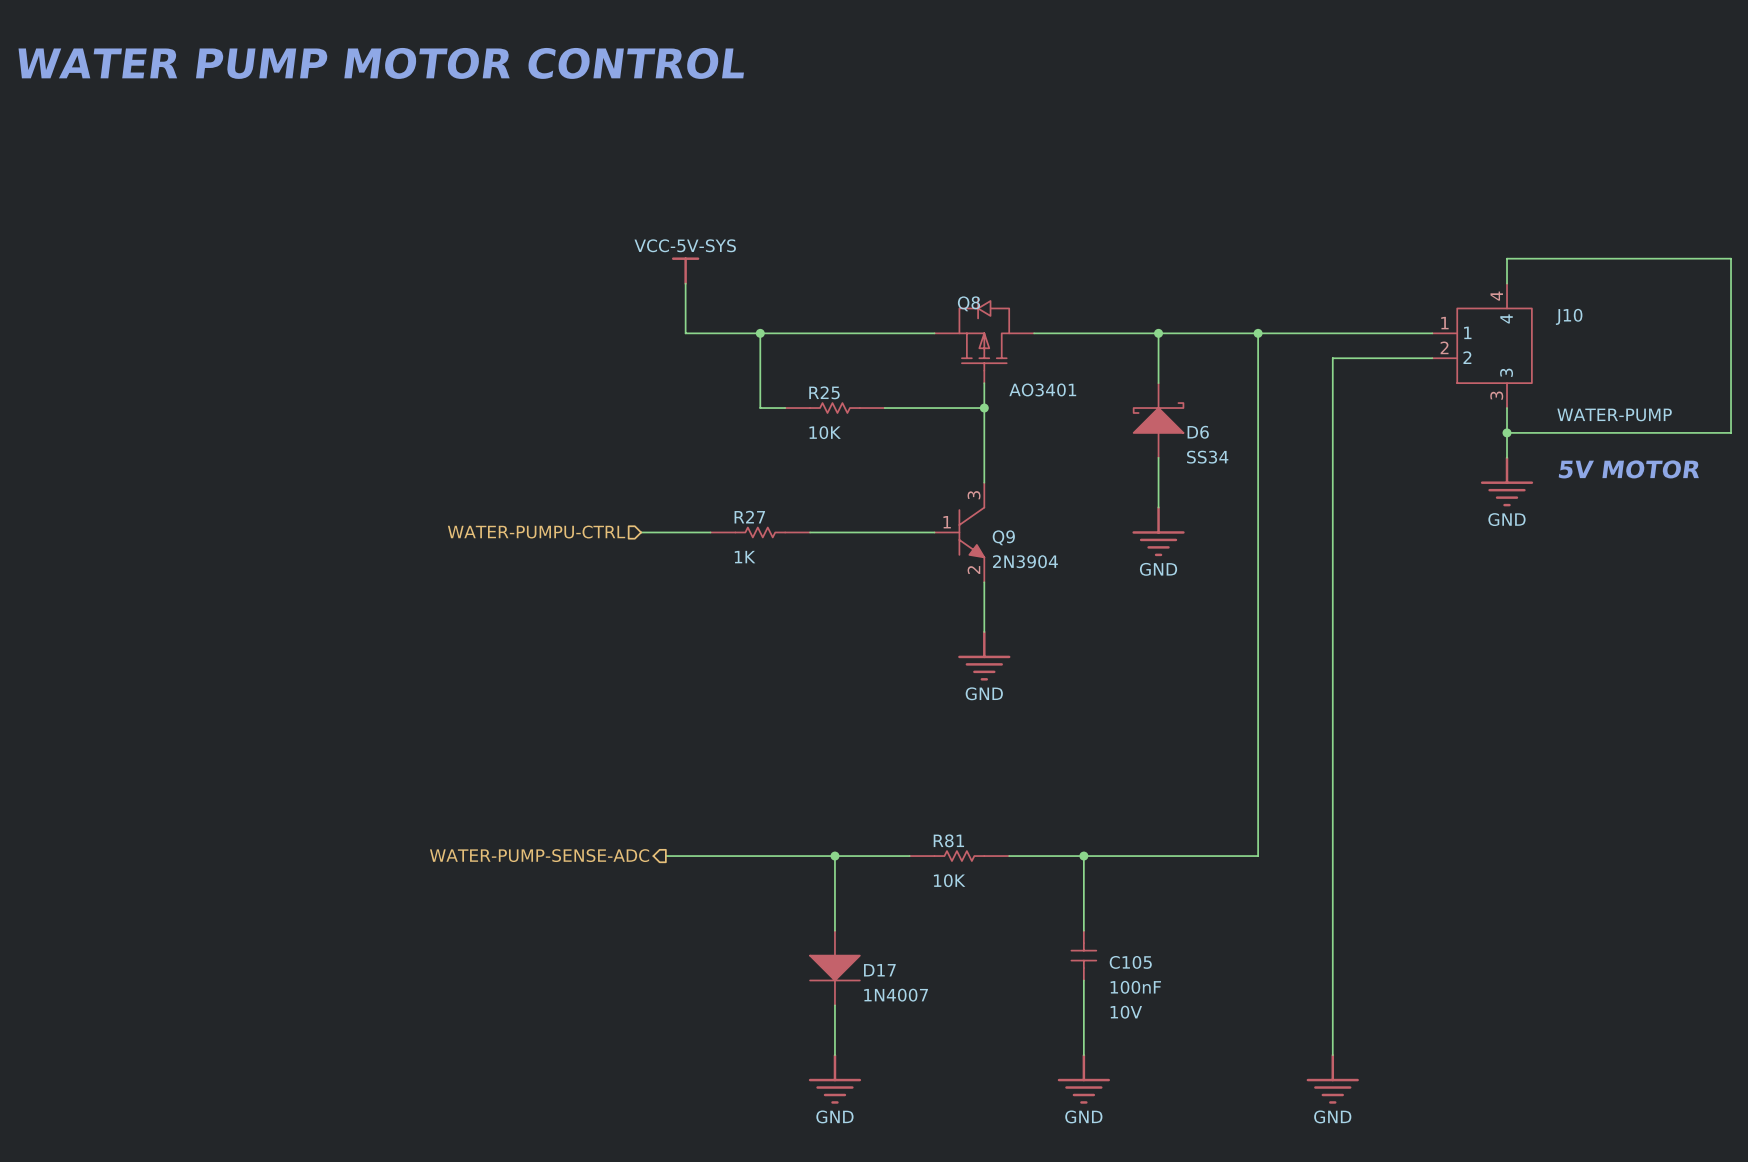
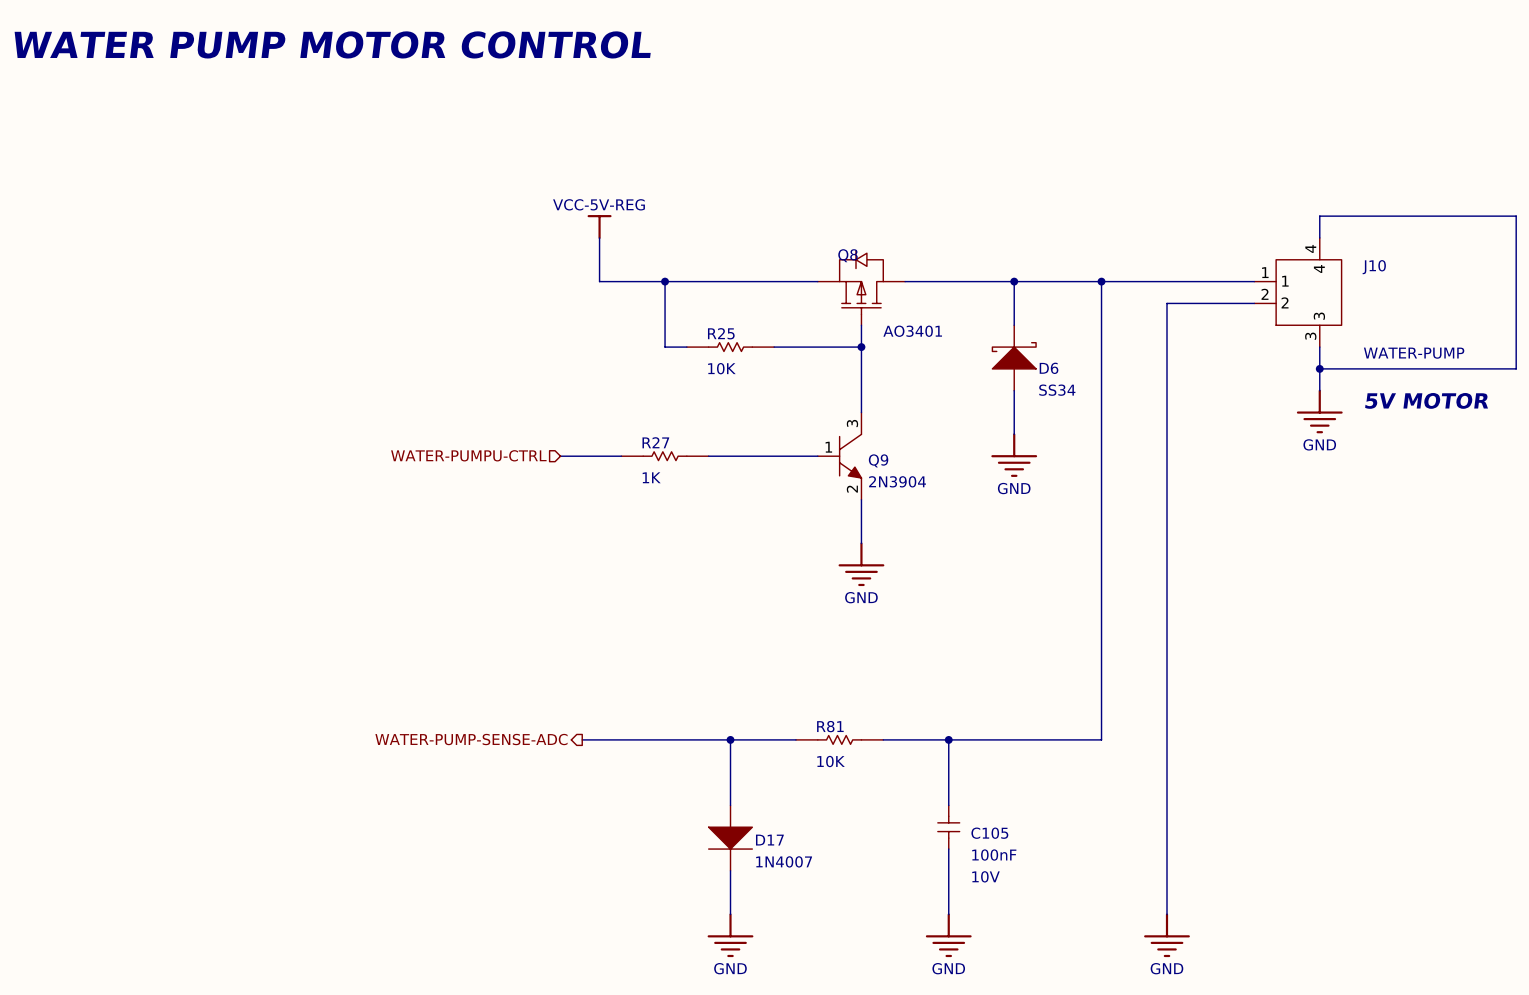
power symbol: VCC-5V-SYS (685, 271) -> VCC-5V-REG (599, 227)

